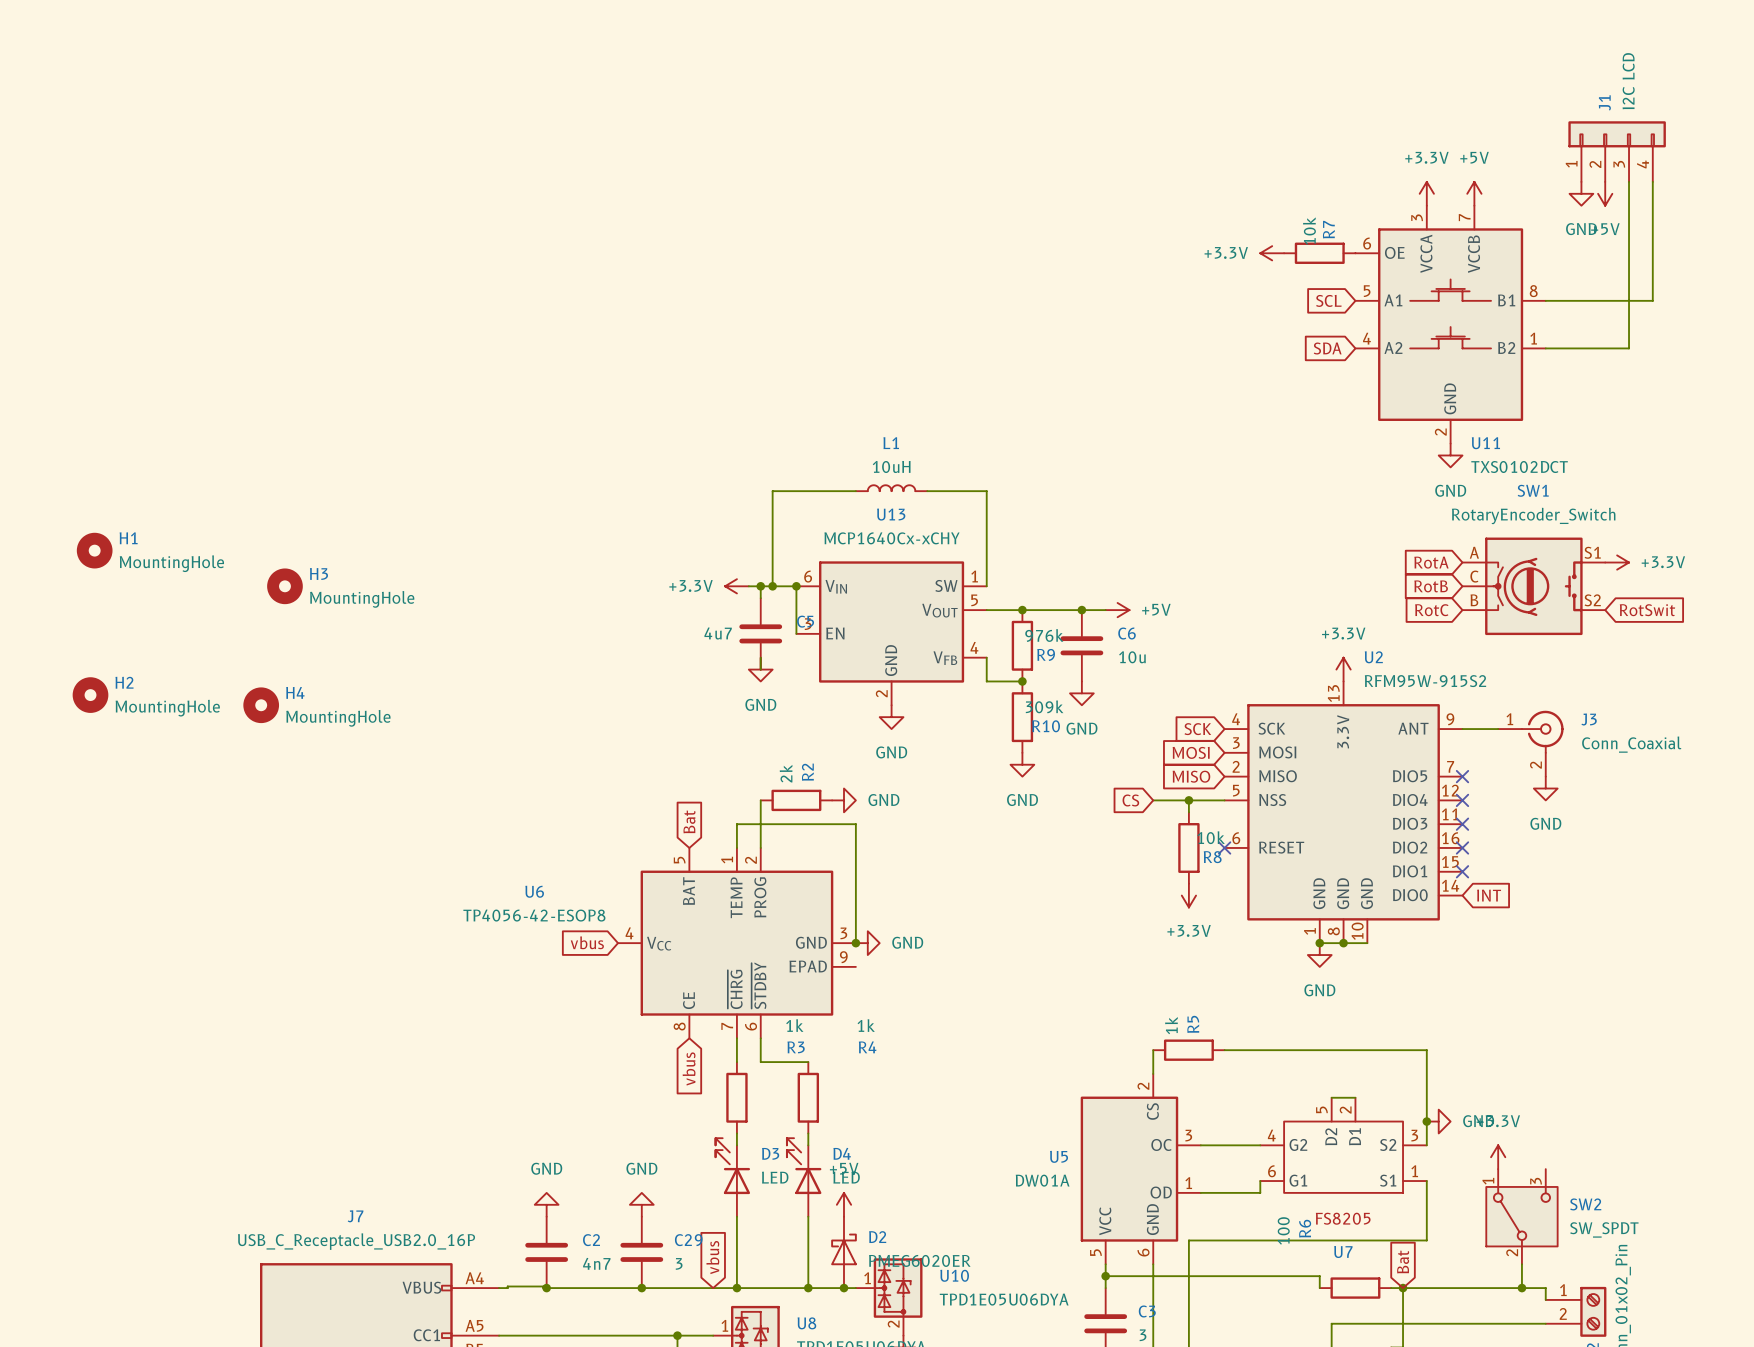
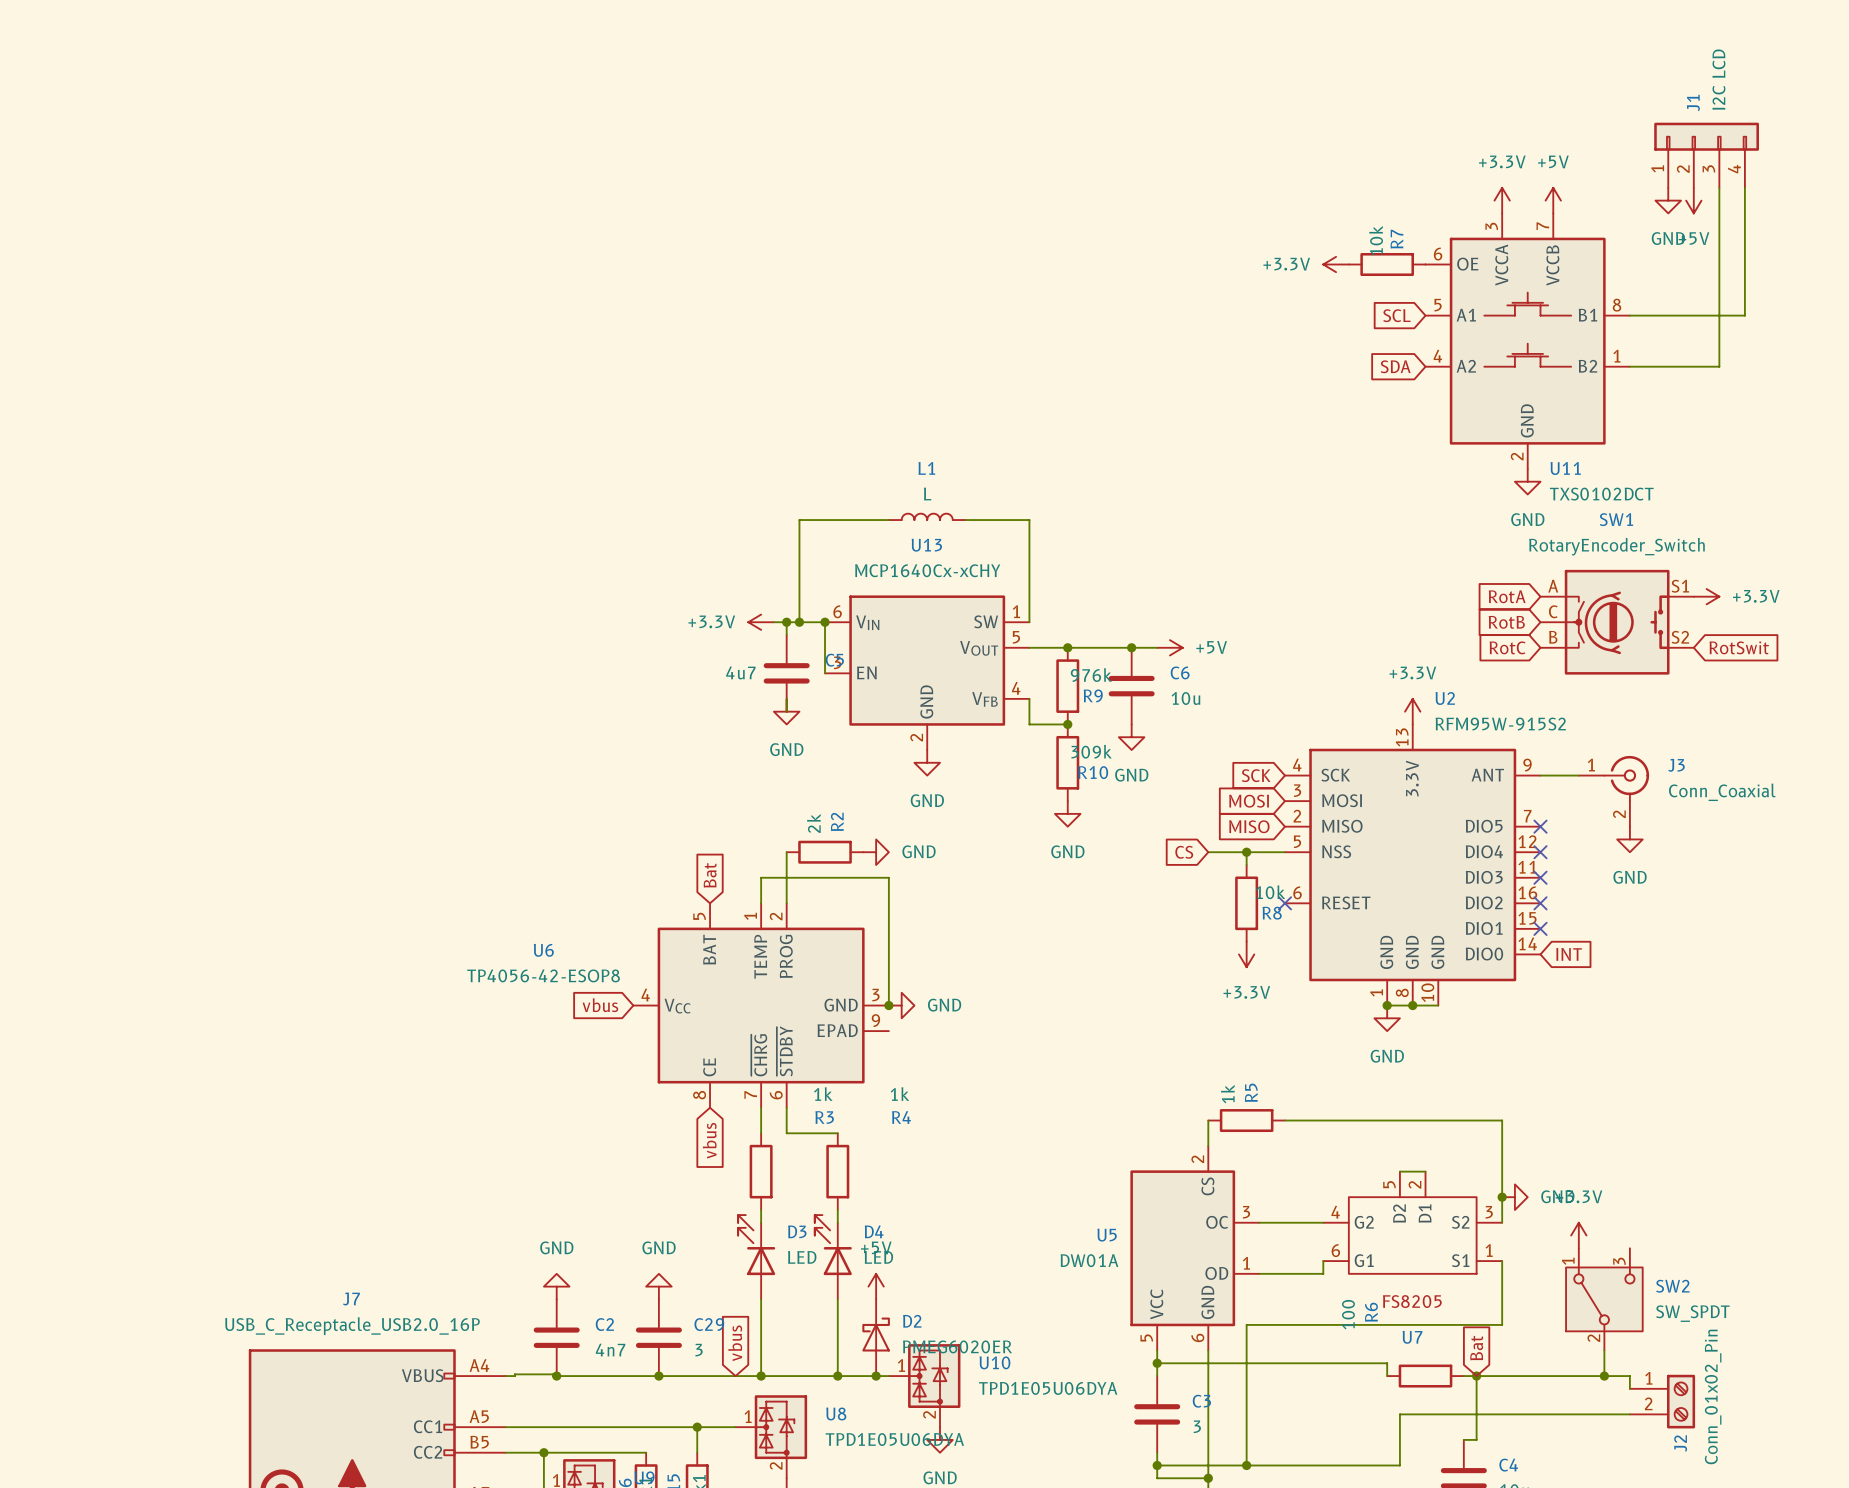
L1 value: 10uH (891, 466) -> L (927, 494)
H1: MountingHole (94, 550) -> none
H3: MountingHole (284, 586) -> none
H2: MountingHole (90, 695) -> none
H4: MountingHole (261, 705) -> none

